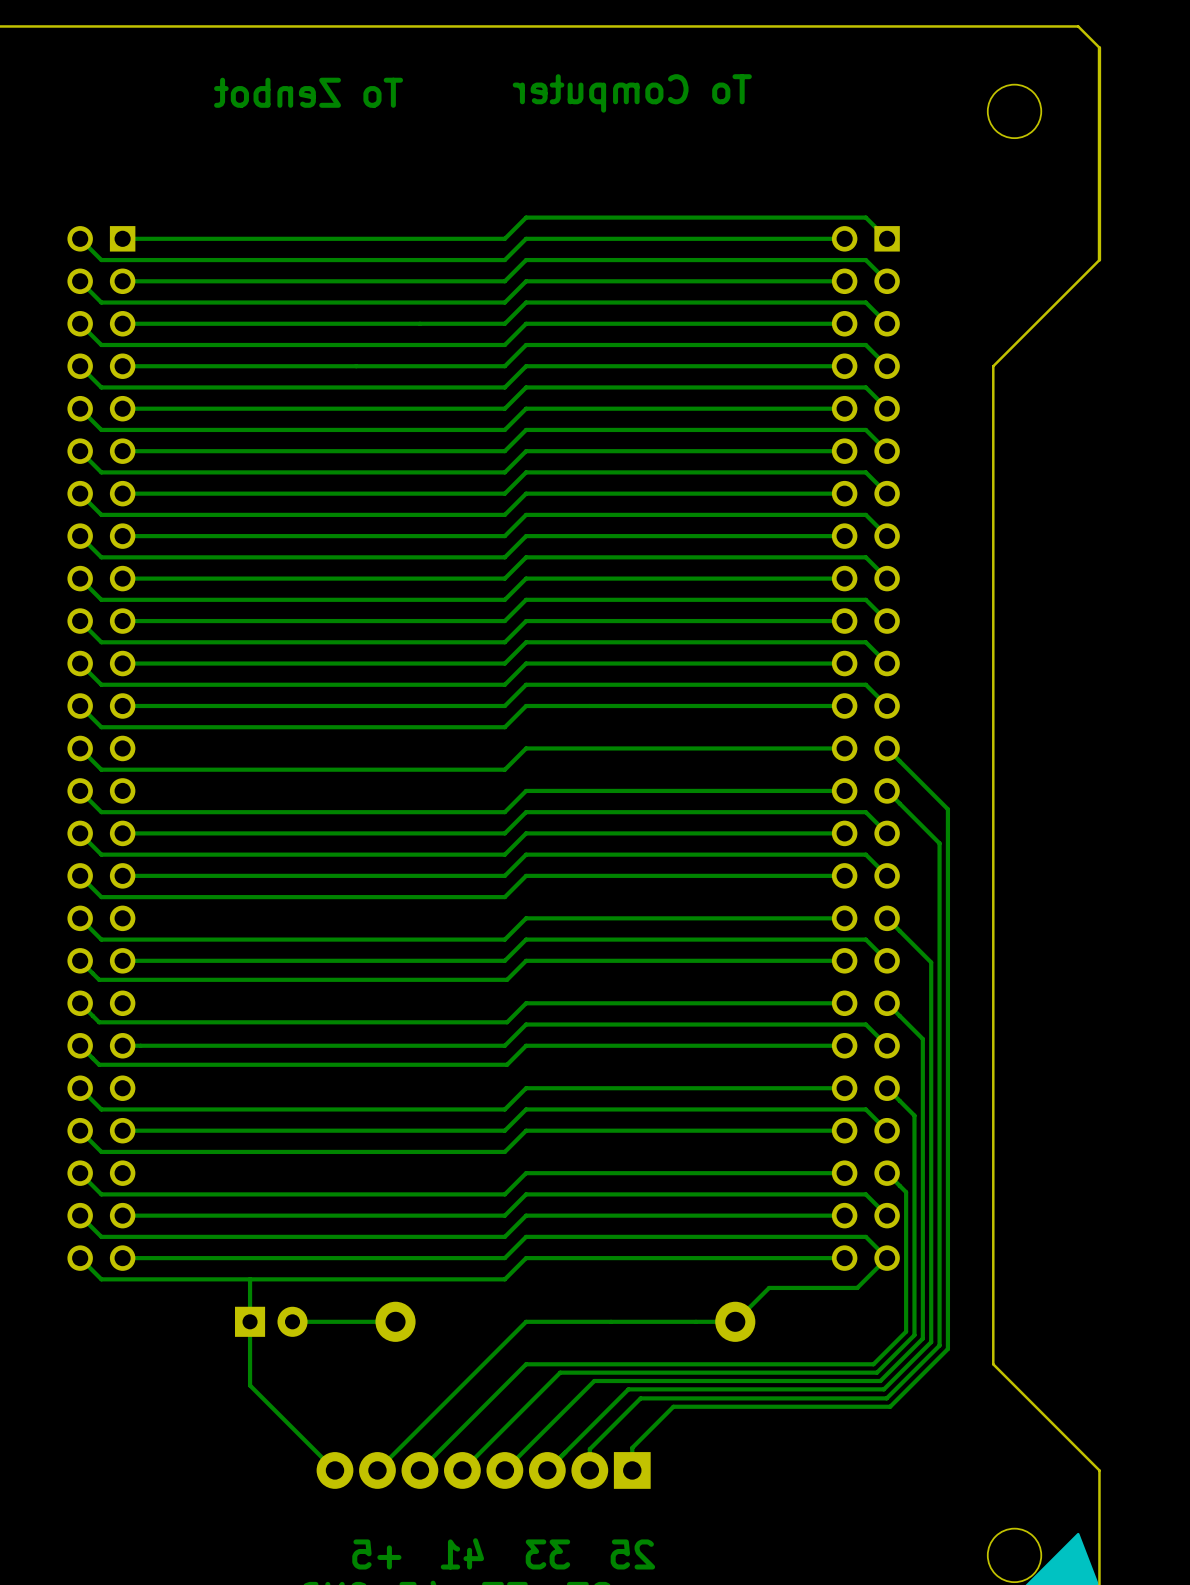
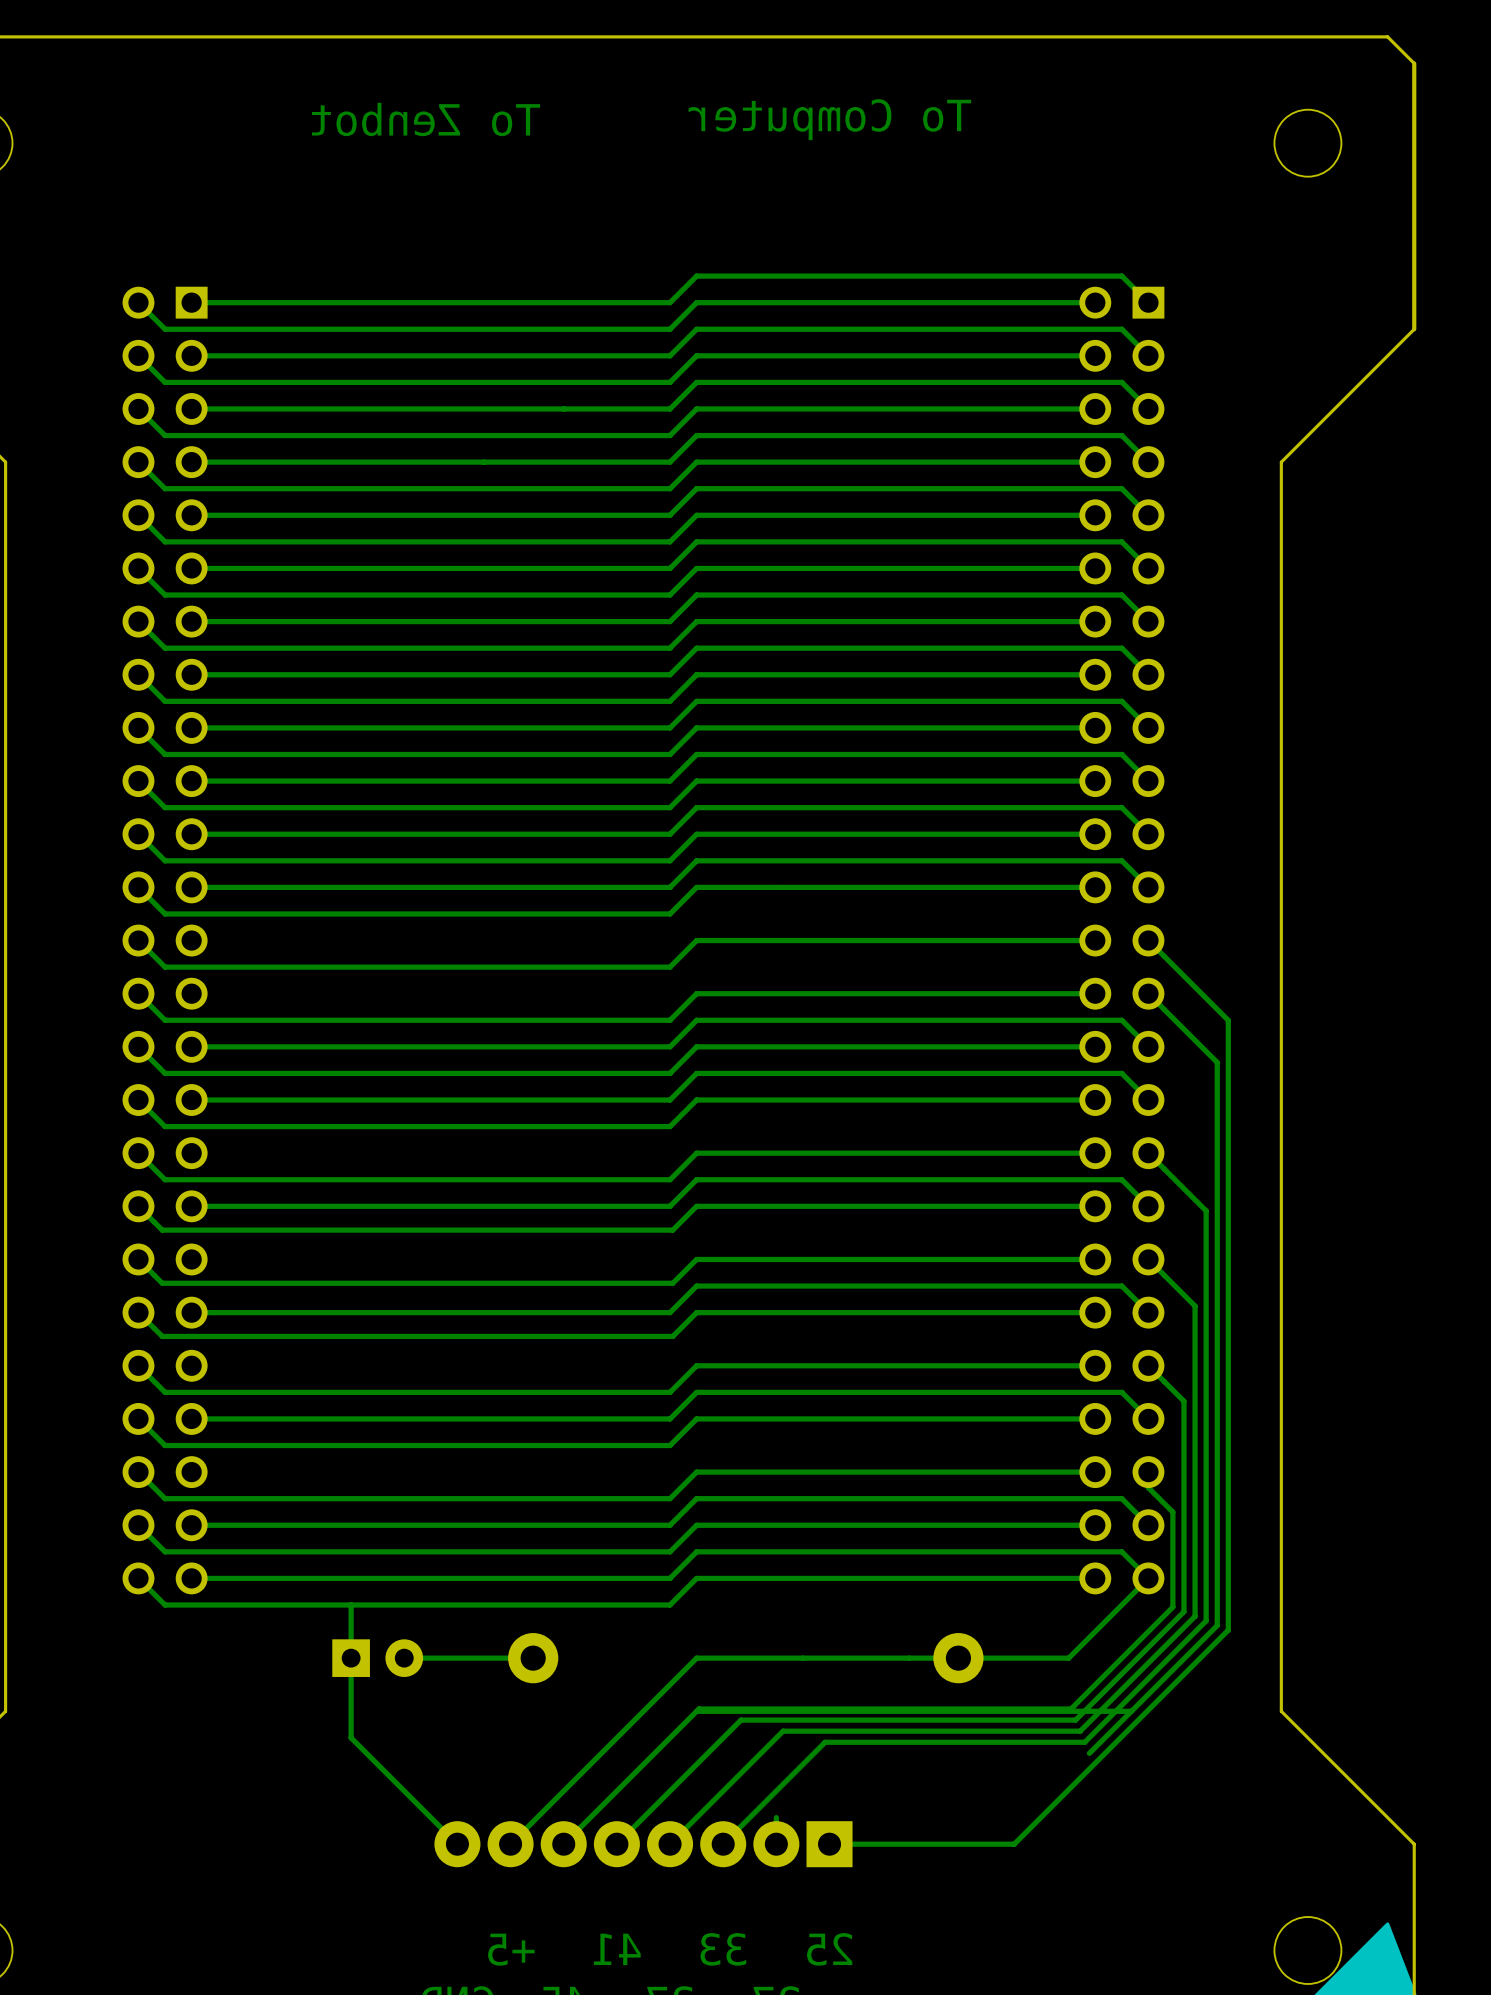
bottom track: (947, 809) (947, 1349) (890, 1406) (673, 1406) (632, 1447) (632, 1470) -> (1224, 1016) (1228, 1020) (1228, 1630) (1014, 1844) (829, 1844)
bottom track: (939, 843) (939, 1345) (886, 1398) (640, 1398) (589, 1449) -> none
bottom track: (931, 962) (931, 1342) (883, 1389) (628, 1389) -> (1203, 1208) (1206, 1210) (1206, 1620) (1084, 1742) (824, 1742)
bottom track: (922, 1039) (922, 1338) (880, 1381) (594, 1381) -> (1193, 1304) (1195, 1306) (1195, 1616) (1080, 1731) (782, 1732)
bottom track: (914, 1115) (914, 1335) (877, 1372) (560, 1372) -> (1182, 1400) (1183, 1611) (1075, 1720) (741, 1720) (739, 1721)
bottom track: (887, 1173) (906, 1192) (906, 1331) -> (1214, 1059) (1217, 1062) (1217, 1625) (1172, 1670)
bottom track: none -> (1148, 1472) (1148, 1487) (1172, 1512) (1172, 1607) (1071, 1709) (698, 1709) (696, 1711)
bottom track: (857, 1287) (769, 1287) (735, 1321) -> (1111, 1615) (1068, 1658) (958, 1658)

